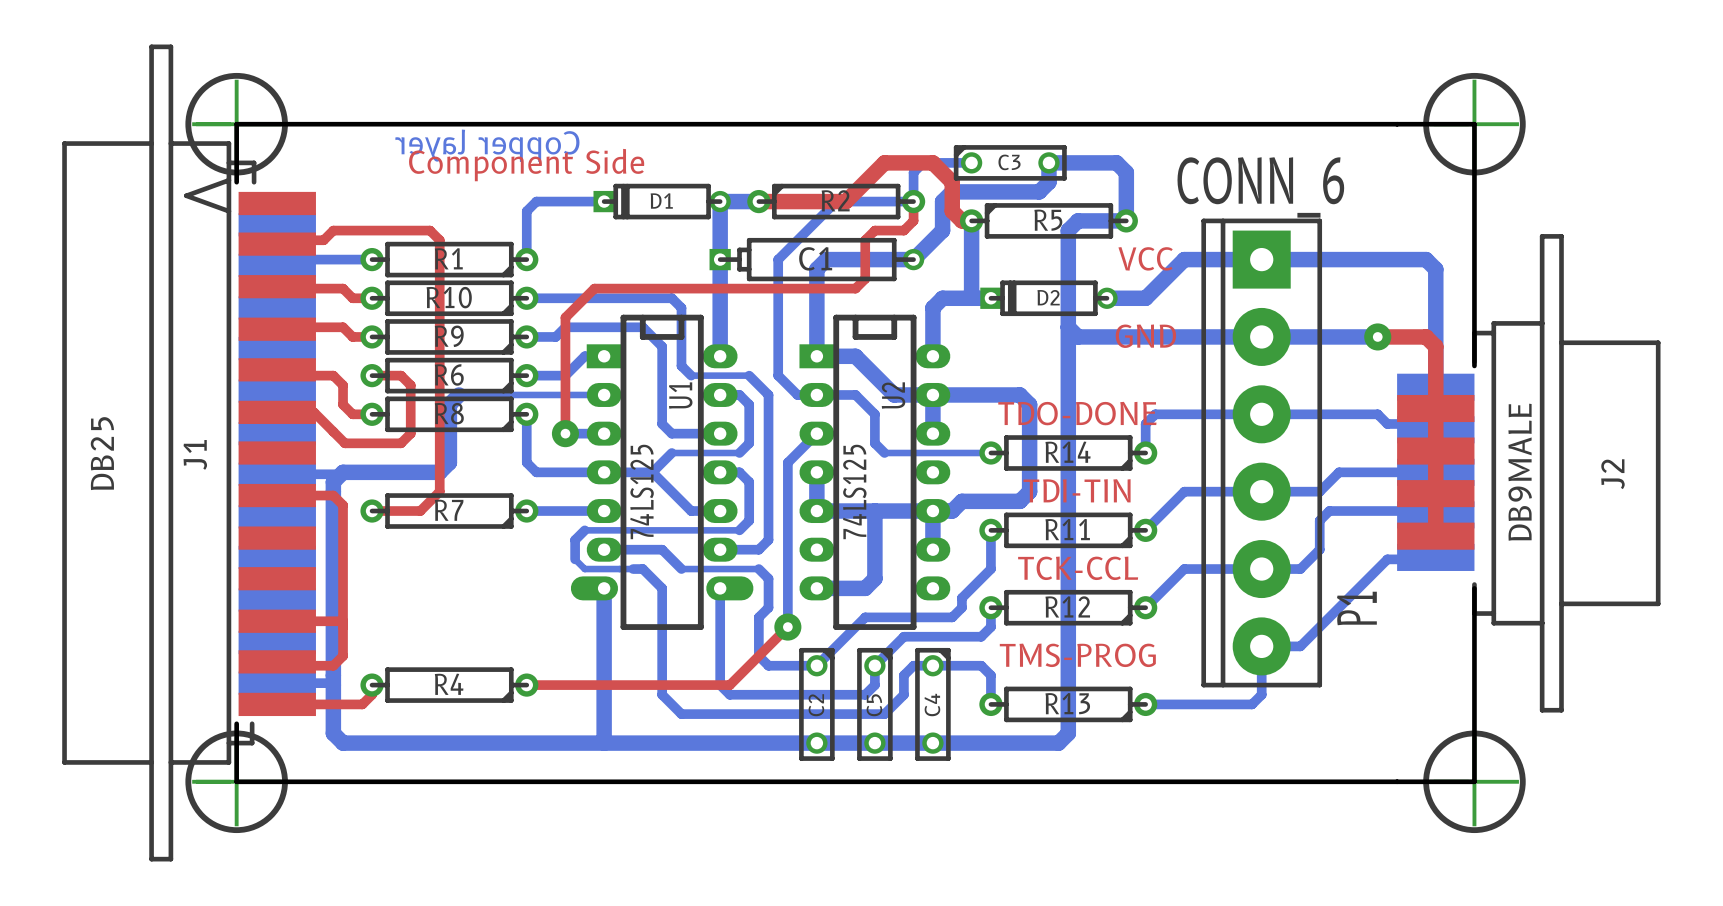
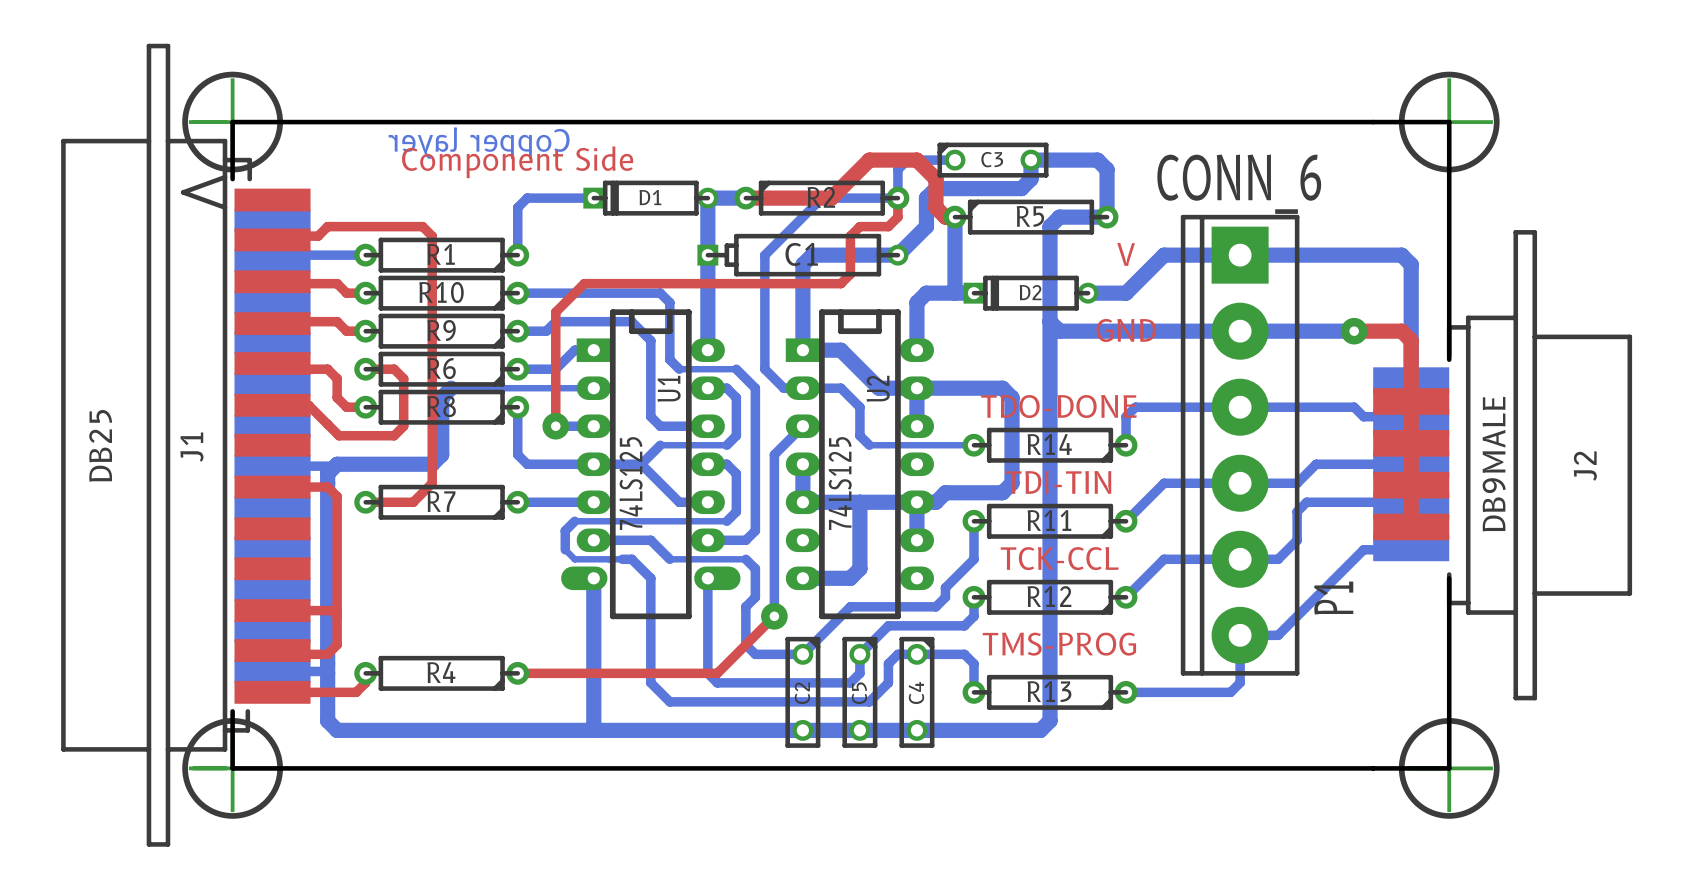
text: VCC (1145, 258) -> V (1126, 254)

